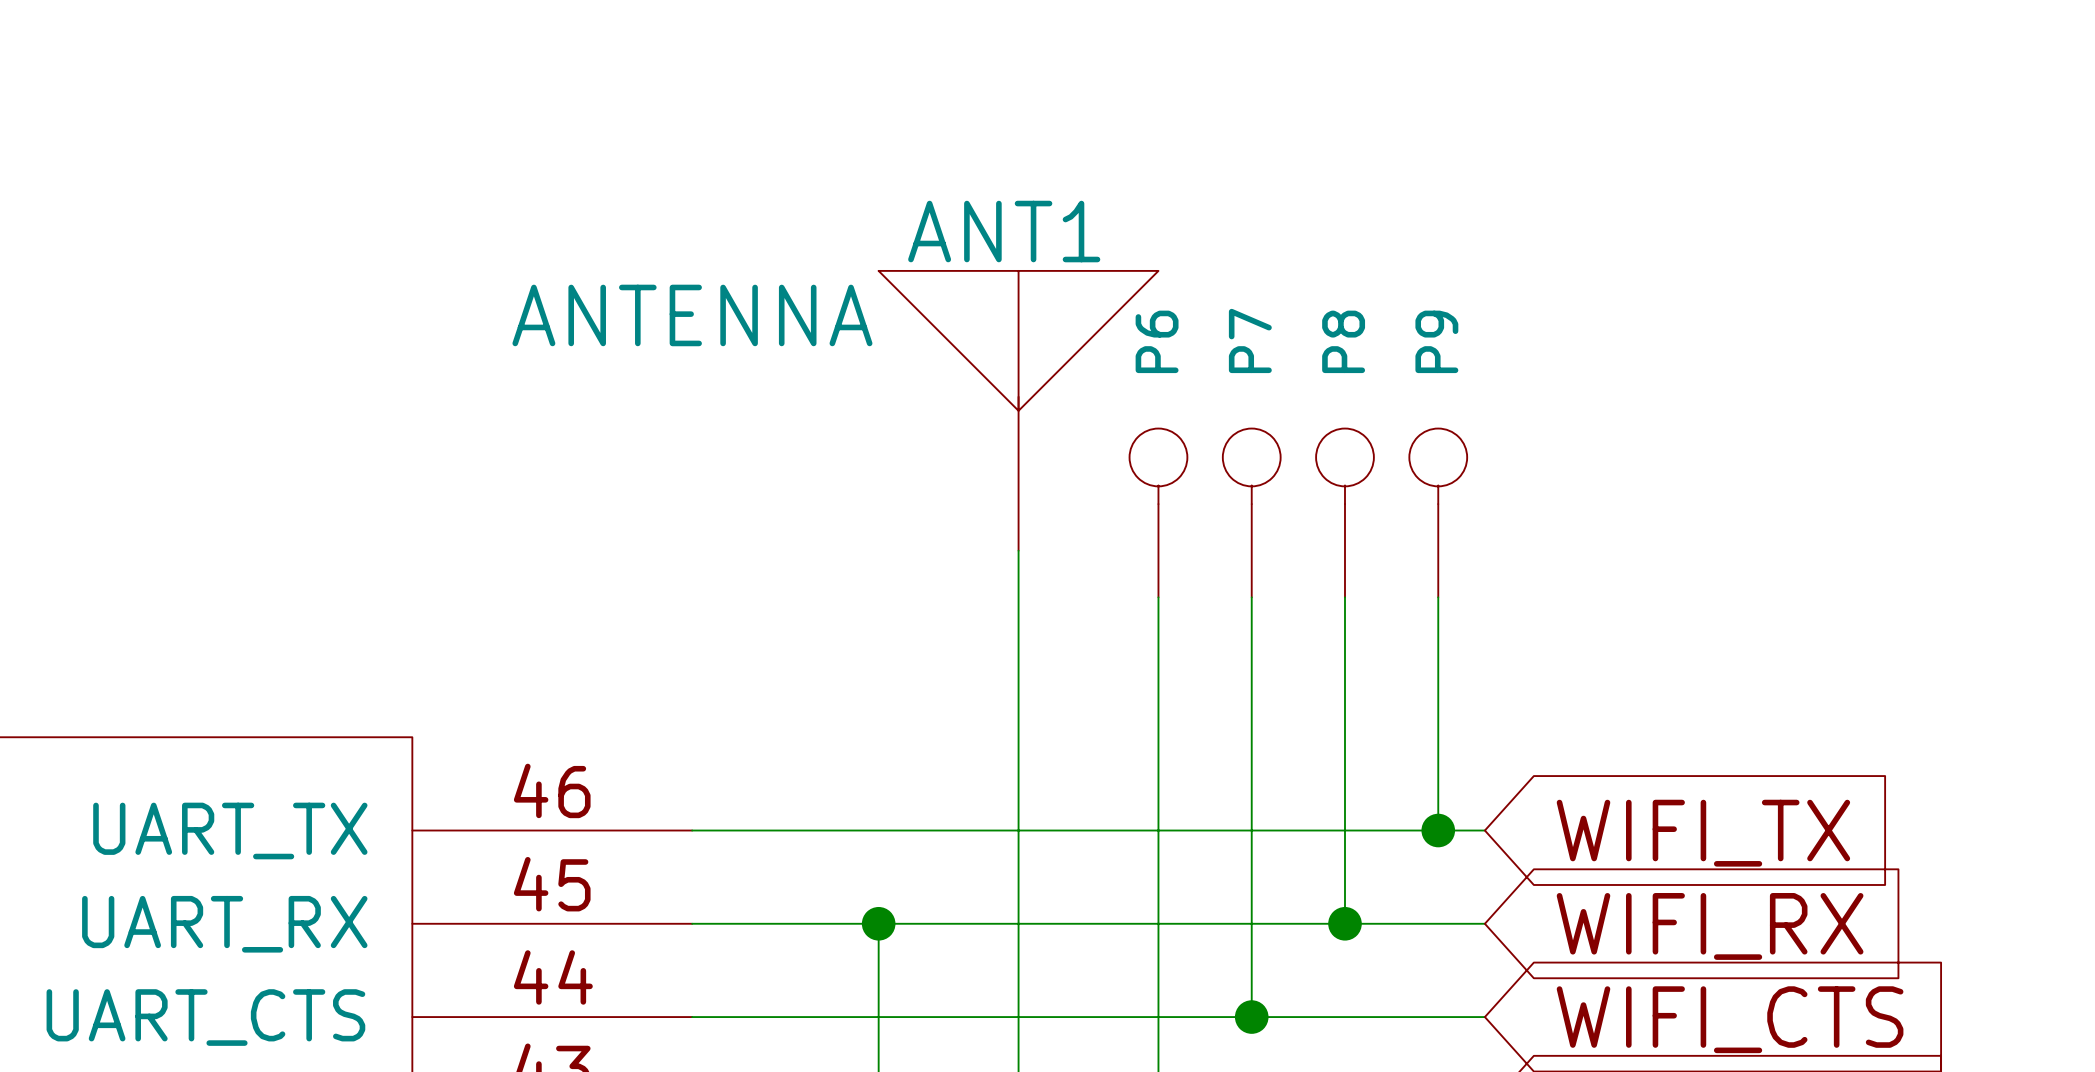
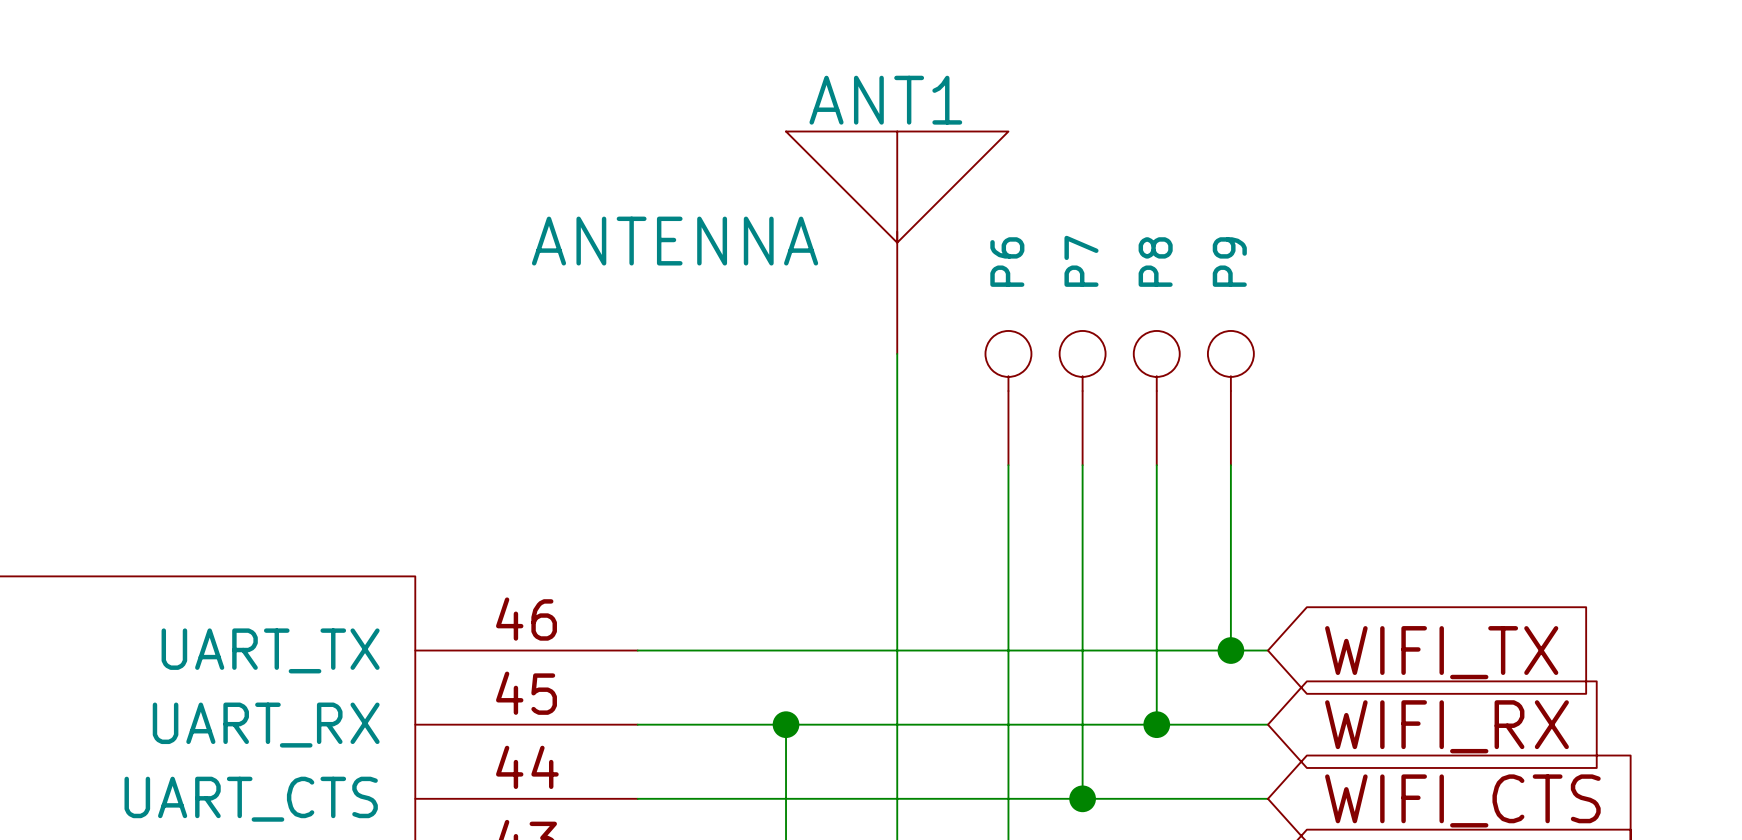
ANT1 value position: ANTENNA (692, 315) -> ANTENNA (675, 241)
ANT1 position: (1018, 410) -> (897, 242)

